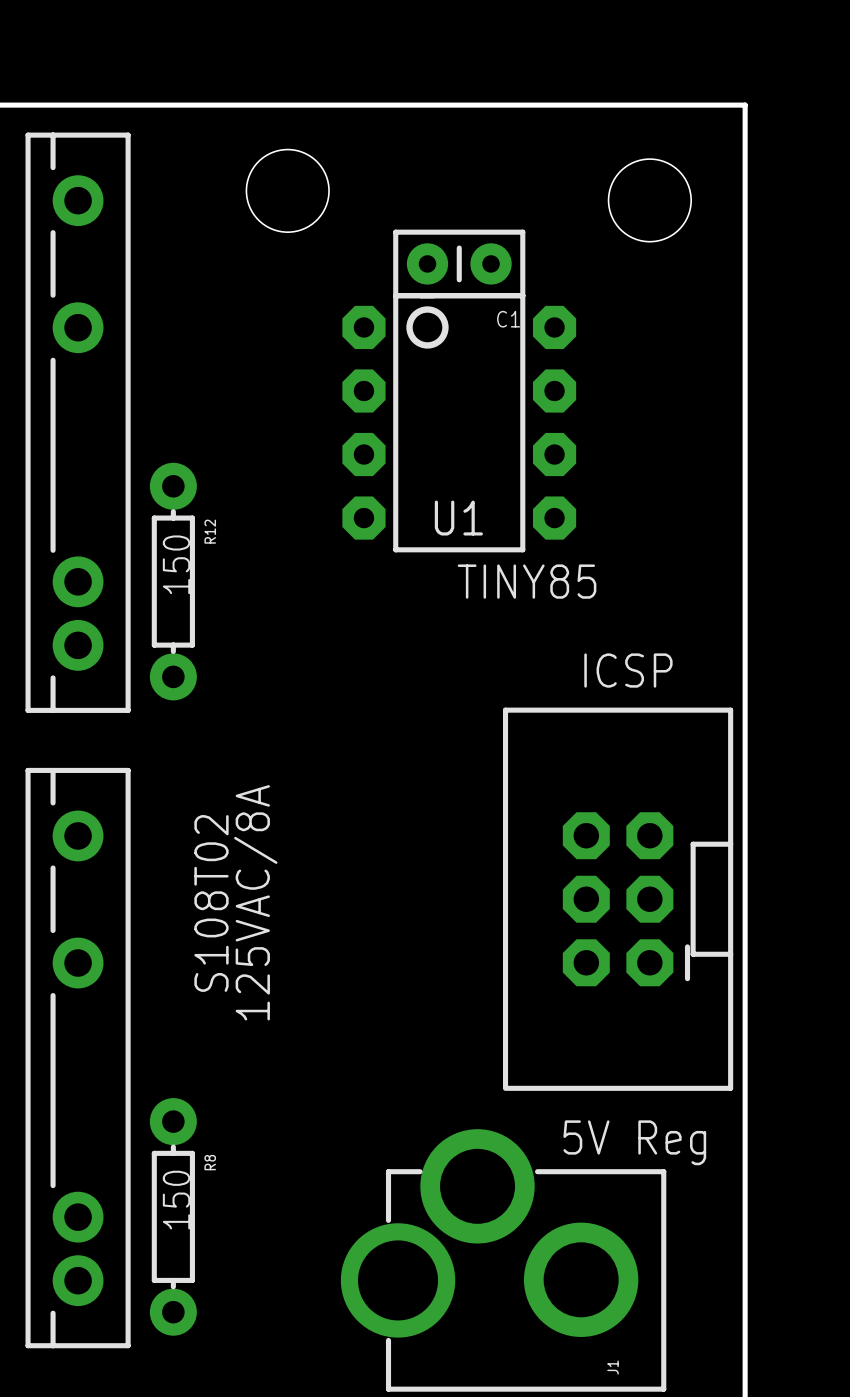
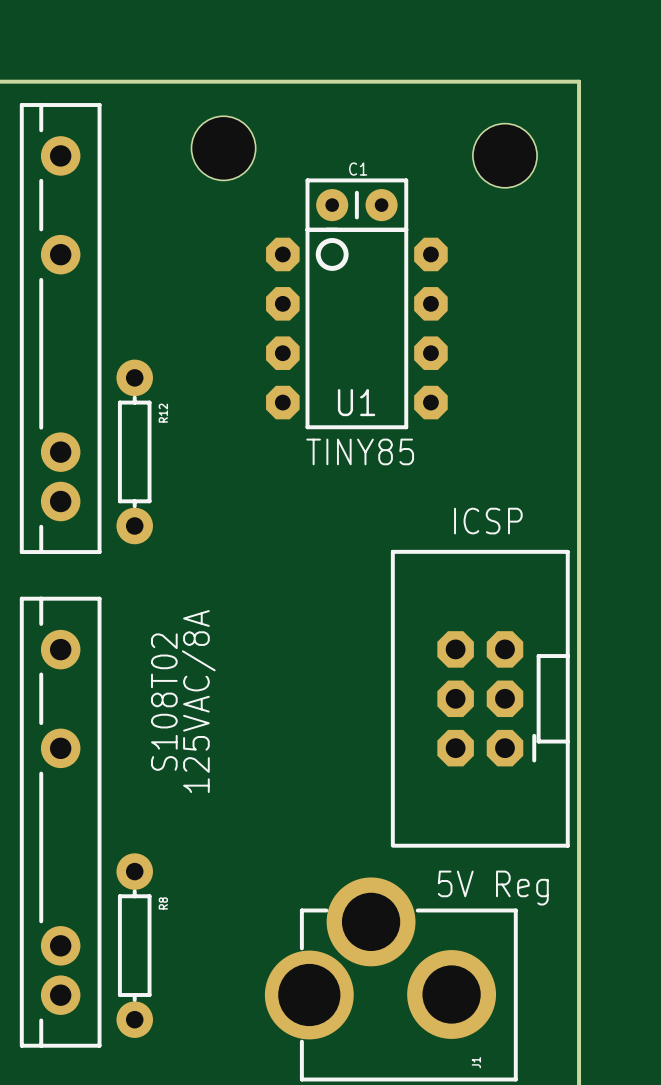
C1 name position: C1 (508, 319) -> C1 (358, 169)
R12 value: 150 (176, 564) -> none
U1 value position: TINY85 (527, 581) -> TINY85 (360, 451)
R8 value: 150 (176, 1200) -> none

